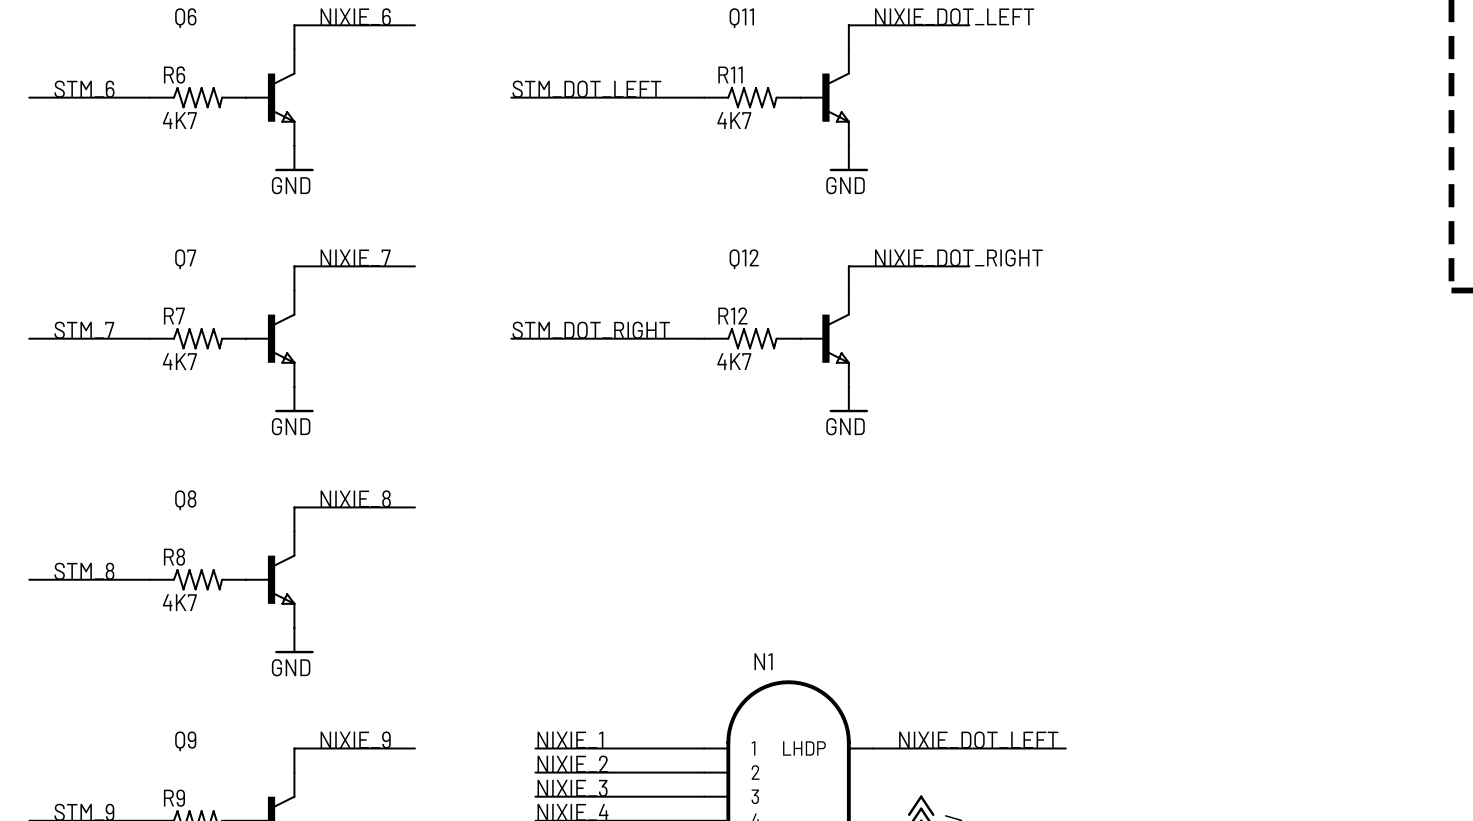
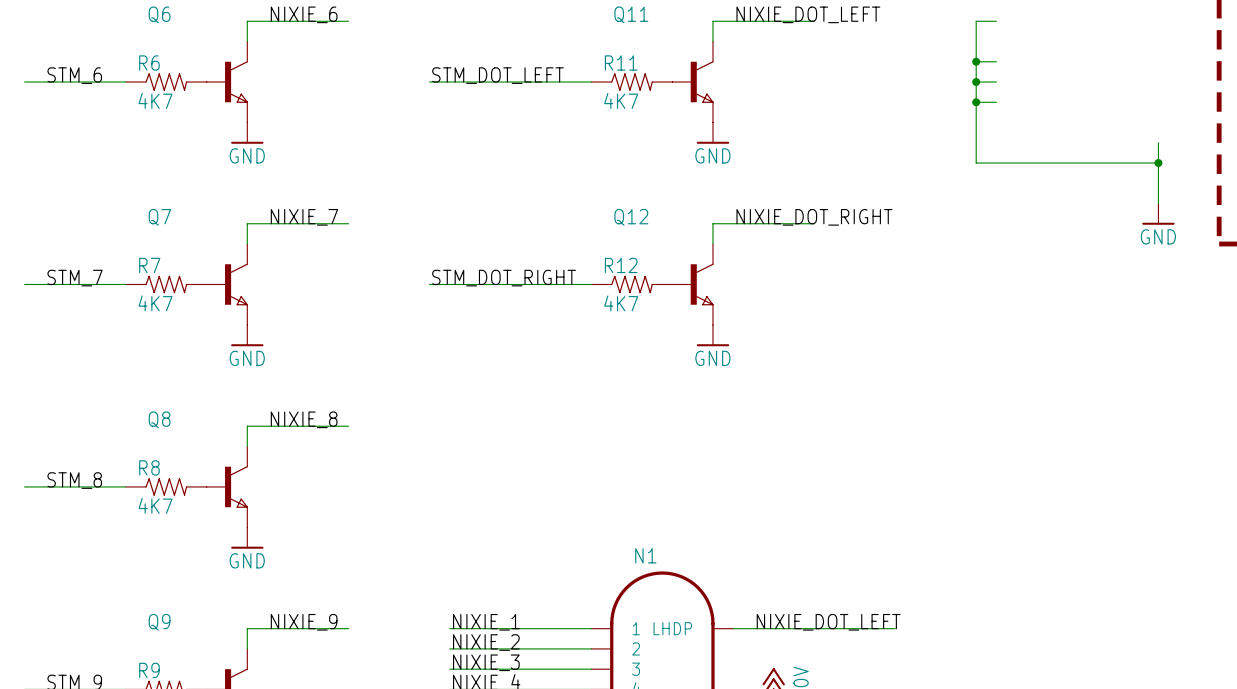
wire: none -> (996, 21) (976, 21) (976, 163) (1158, 163)
wire: none -> (976, 61) (996, 61)
junction: none -> (976, 61)
wire: none -> (976, 82) (996, 82)
junction: none -> (976, 82)
wire: none -> (976, 102) (996, 102)
junction: none -> (976, 102)
wire: none -> (1158, 142) (1158, 203)
junction: none -> (1158, 163)
power symbol: none -> GND (1158, 214)

